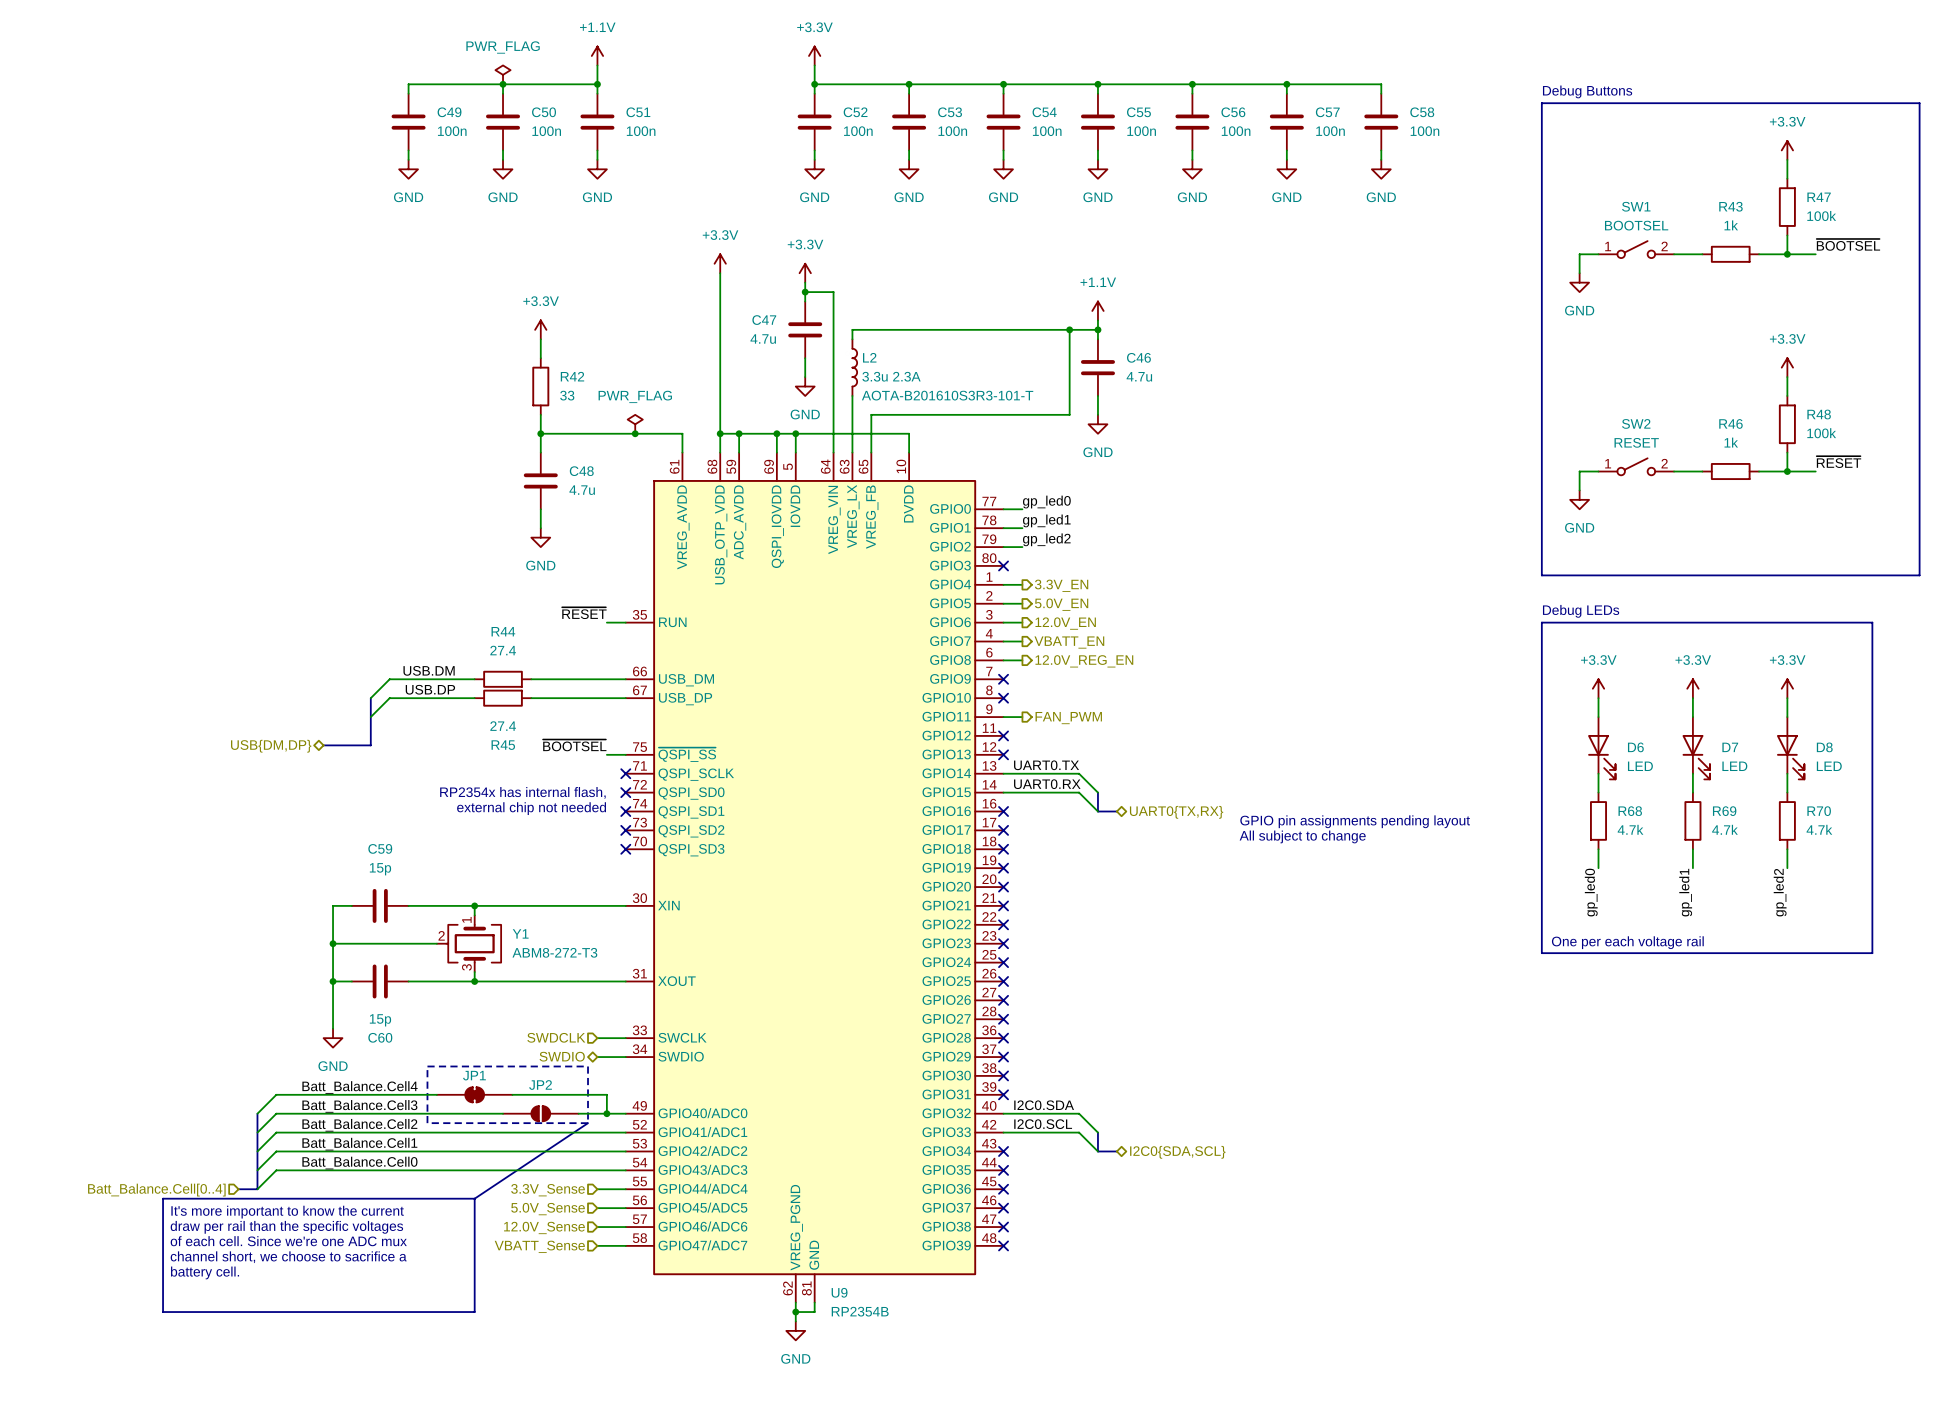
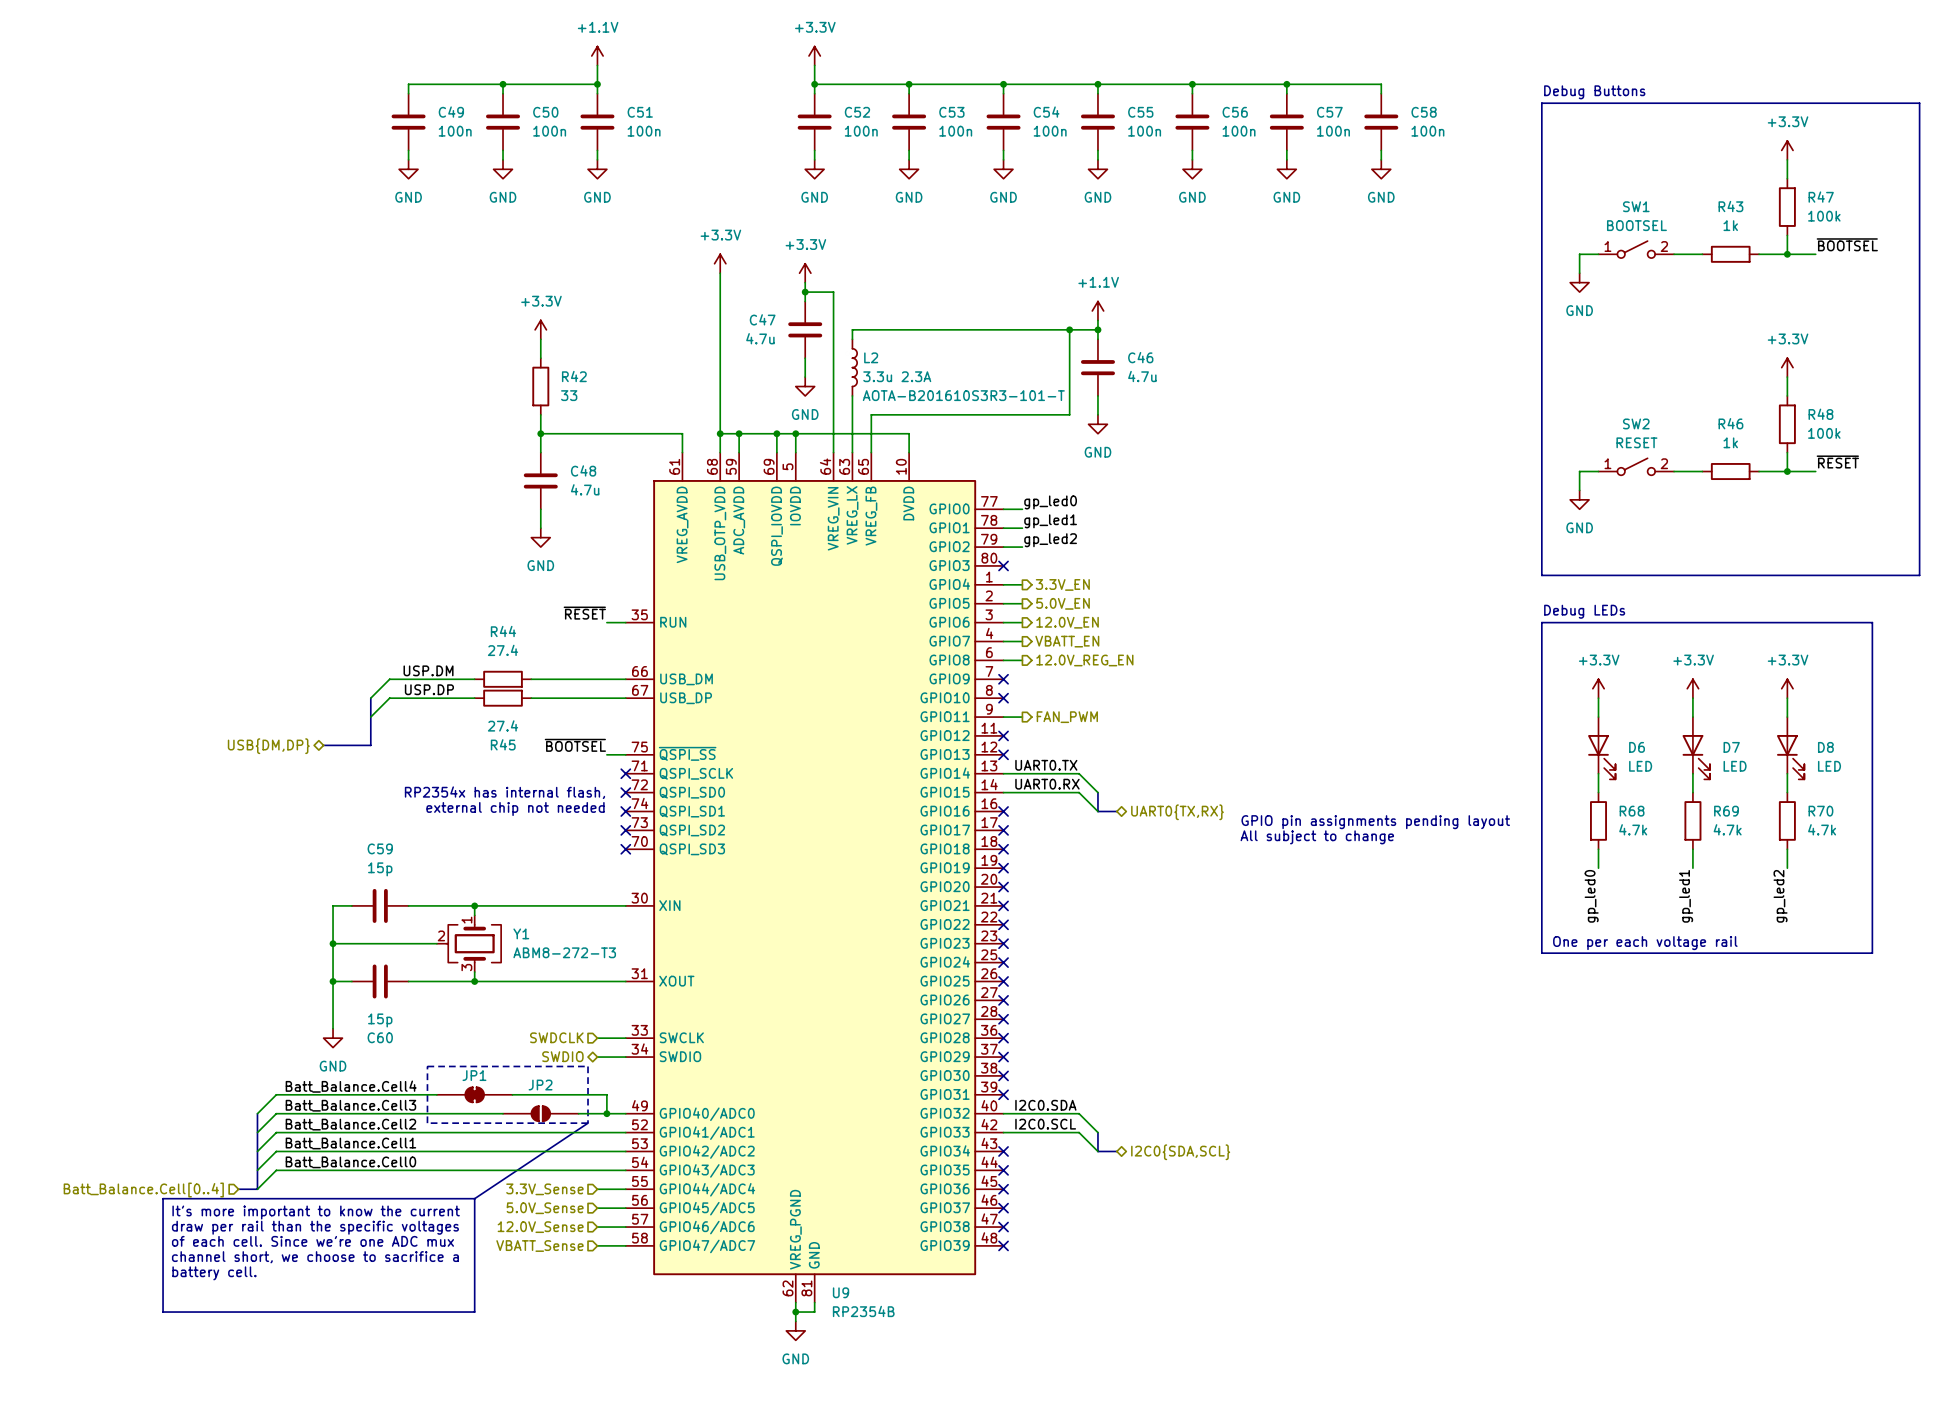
power symbol: PWR_FLAG (503, 74) -> none
power symbol: PWR_FLAG (635, 424) -> none
junction: (635, 433) -> none
label: USB.DM (429, 670) -> USP.DM (428, 670)
label: USB.DP (430, 689) -> USP.DP (429, 689)

